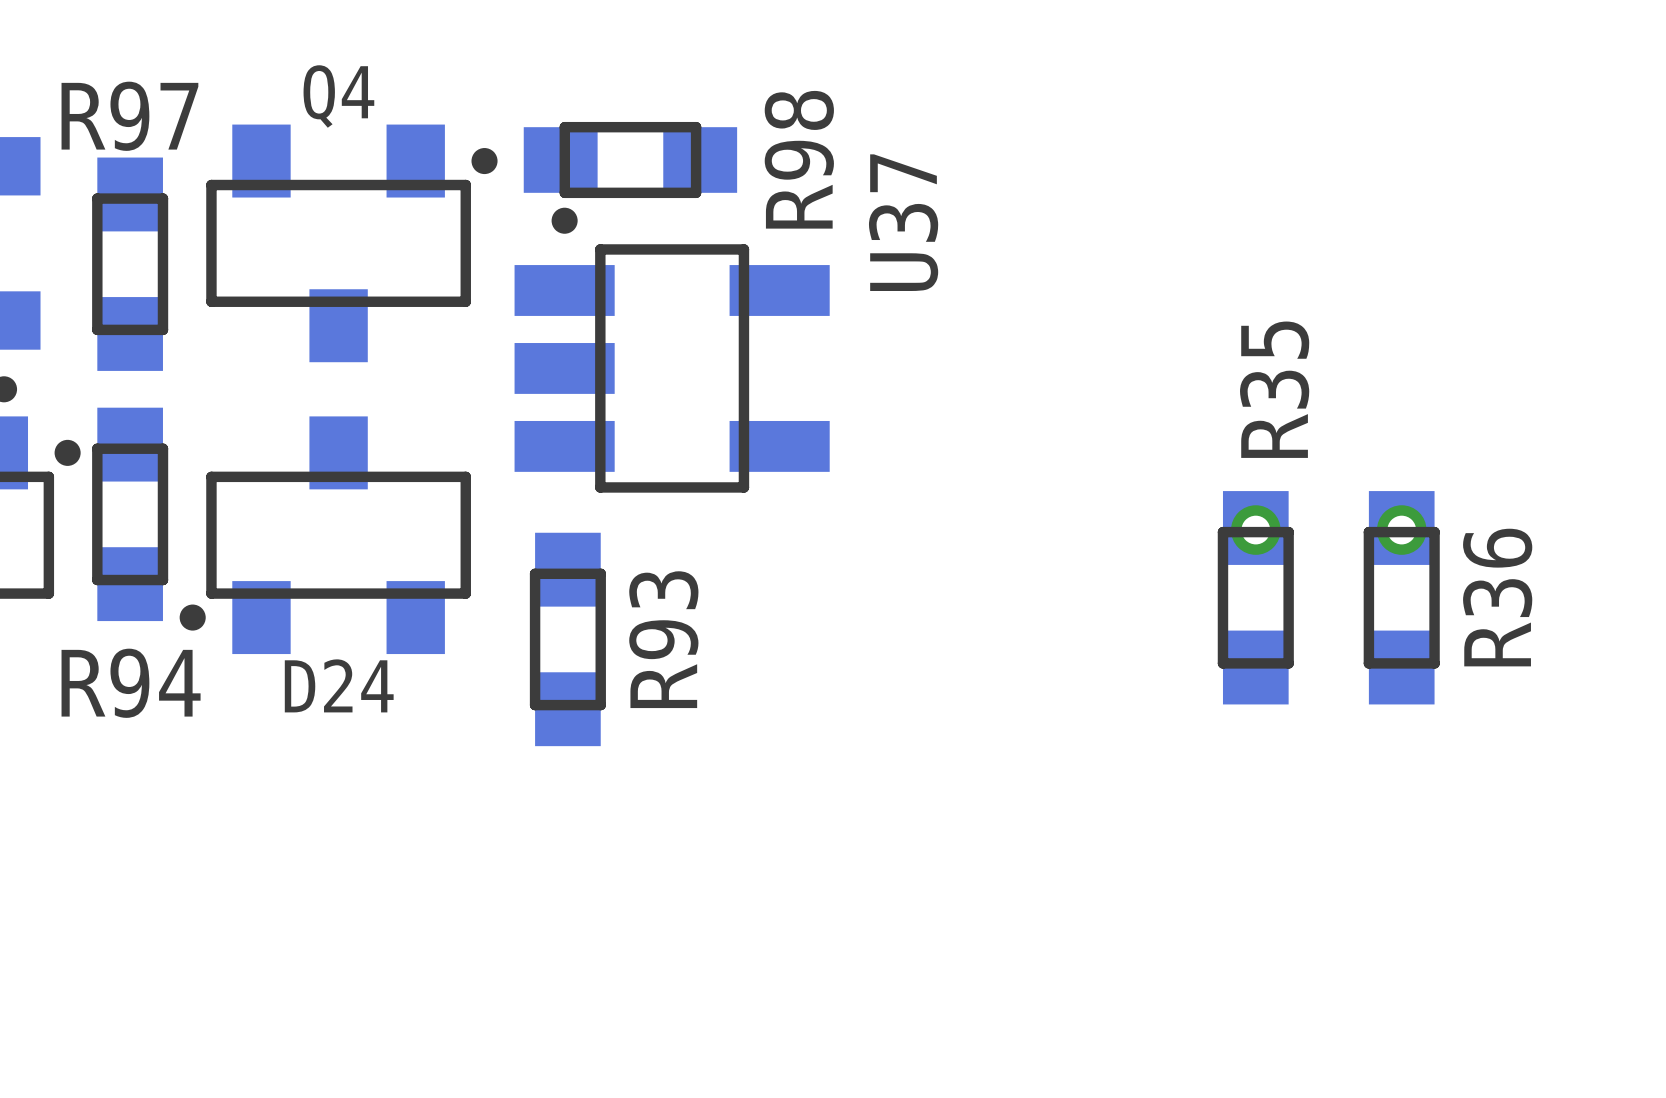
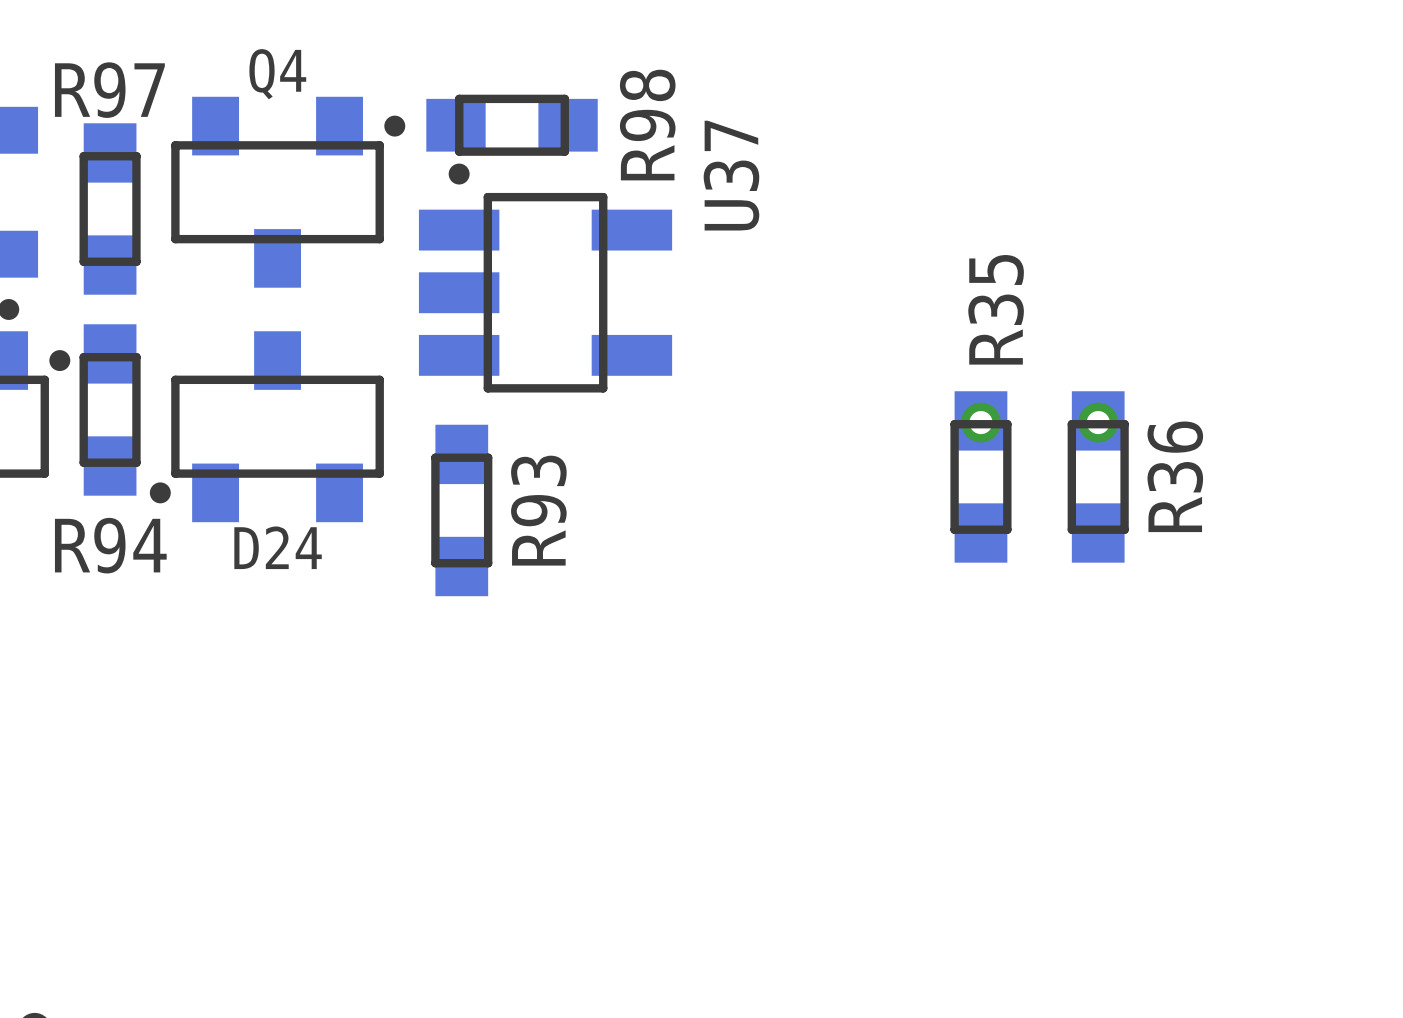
via position: (1255, 530) -> (980, 422)
via position: (1401, 530) -> (1098, 422)
R35 position: (1255, 597) -> (980, 476)
R36 position: (1401, 597) -> (1098, 476)

